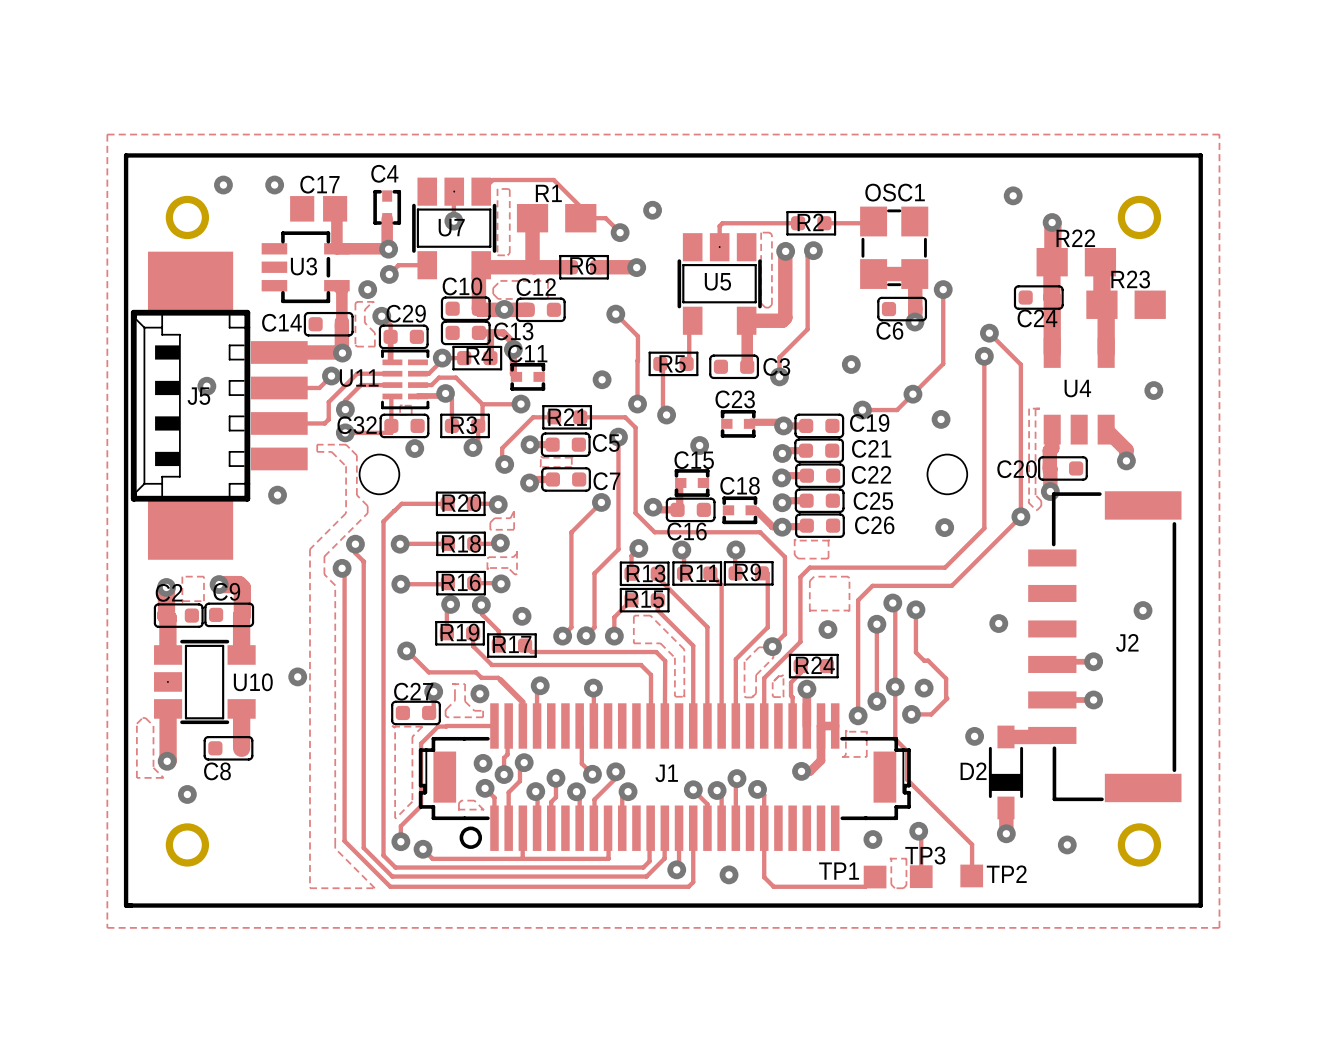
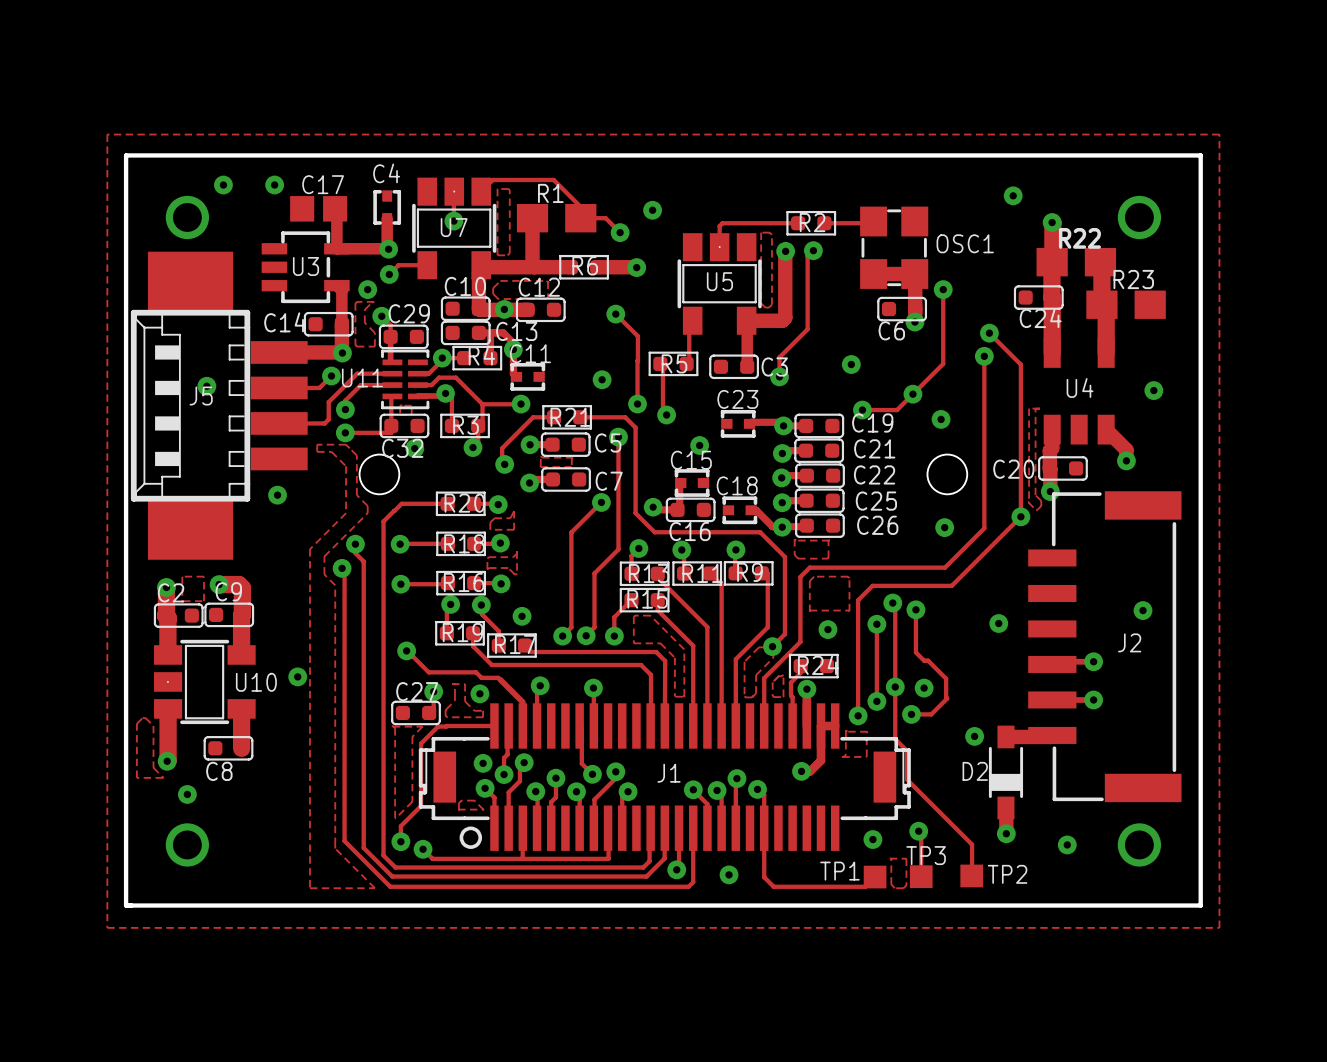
OSC1 name position: OSC1 (895, 192) -> OSC1 (965, 243)
C32 name position: C32 (357, 425) -> C32 (402, 448)

